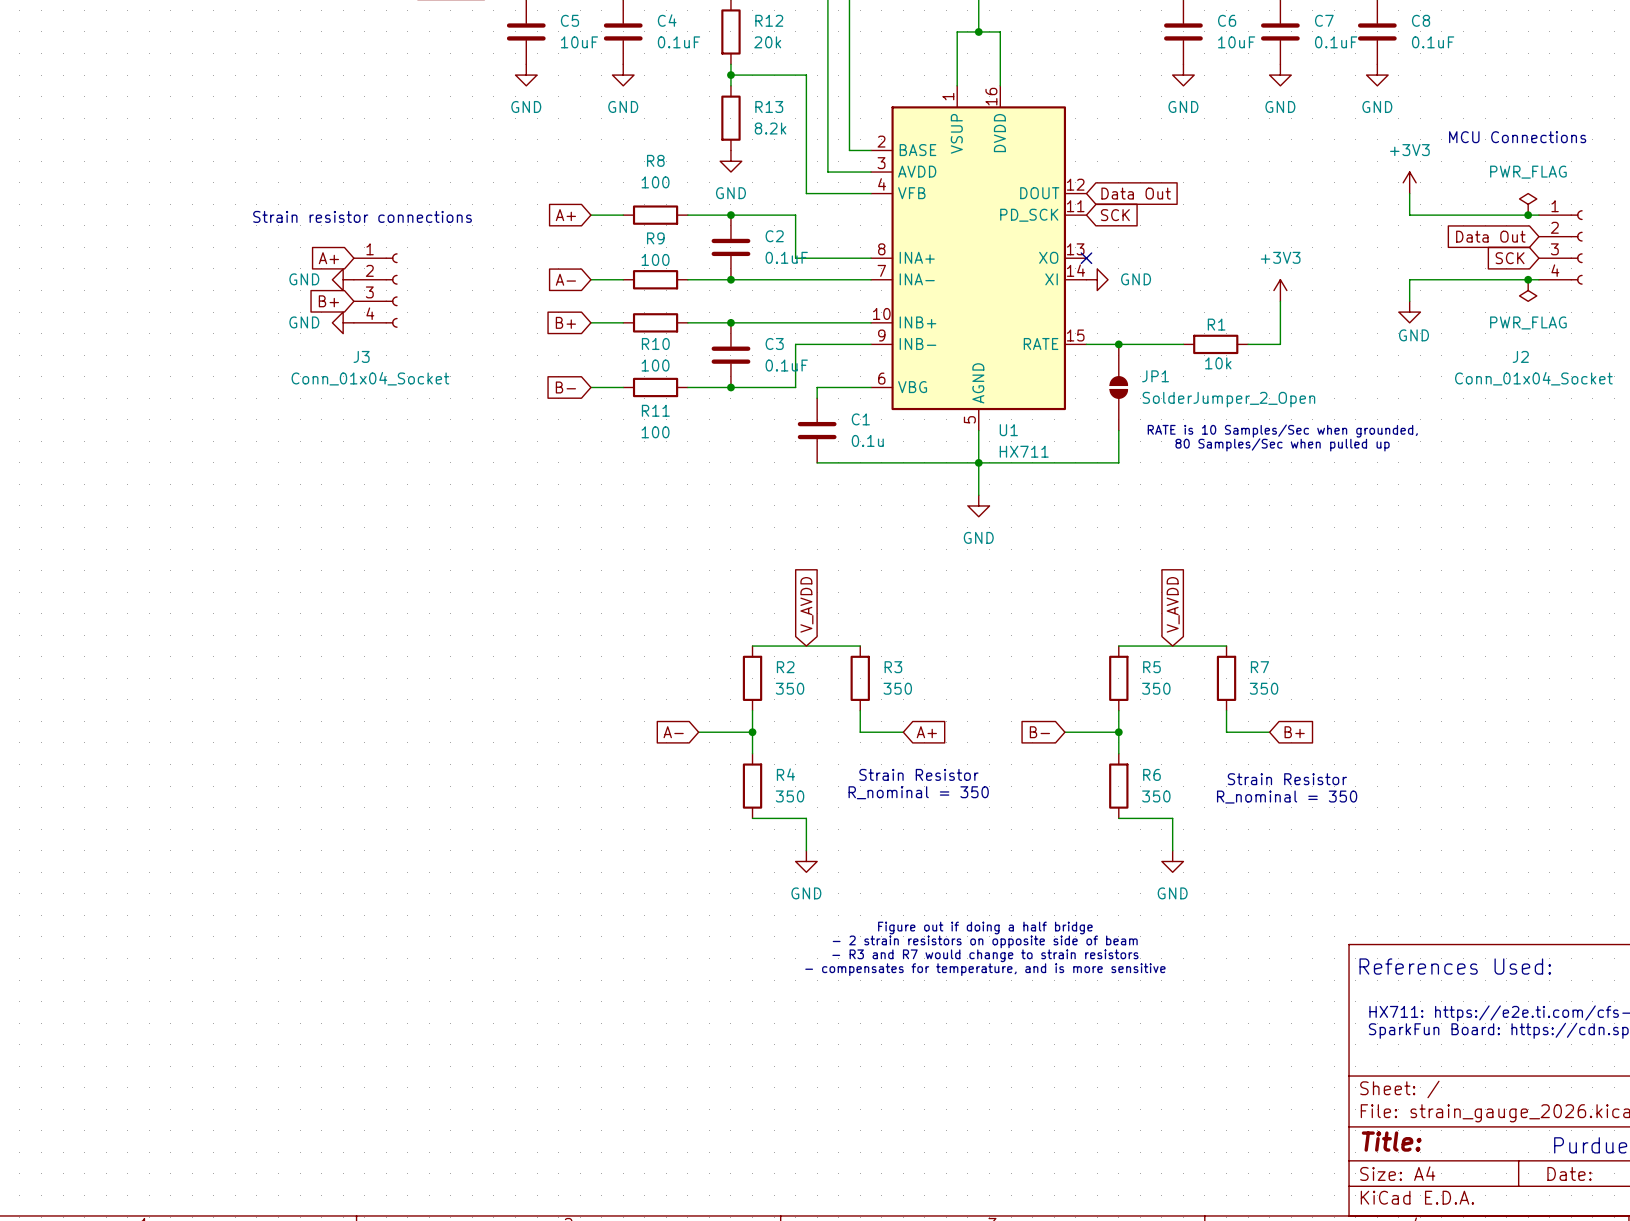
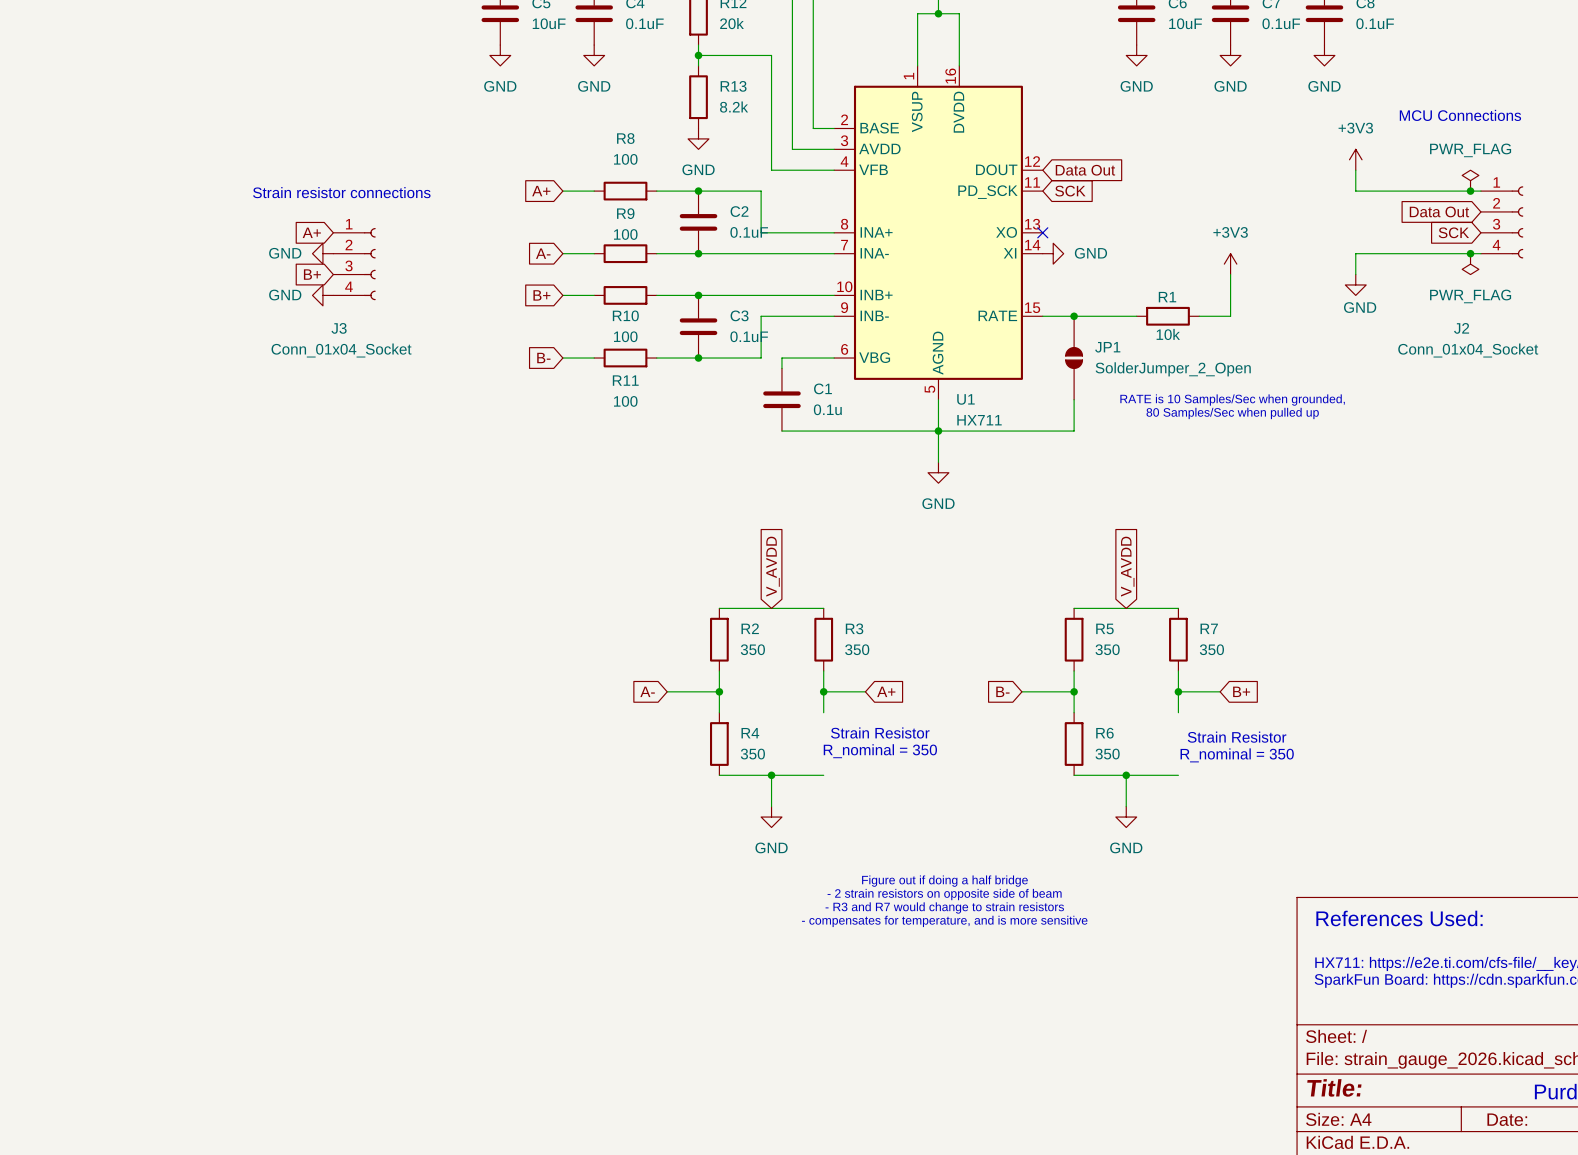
wire: none -> (823, 691) (823, 712)
junction: none -> (823, 691)
wire: none -> (1178, 691) (1178, 712)
junction: none -> (1178, 691)
wire: none -> (771, 775) (823, 775)
junction: none -> (771, 775)
wire: none -> (1126, 775) (1178, 775)
junction: none -> (1126, 775)

